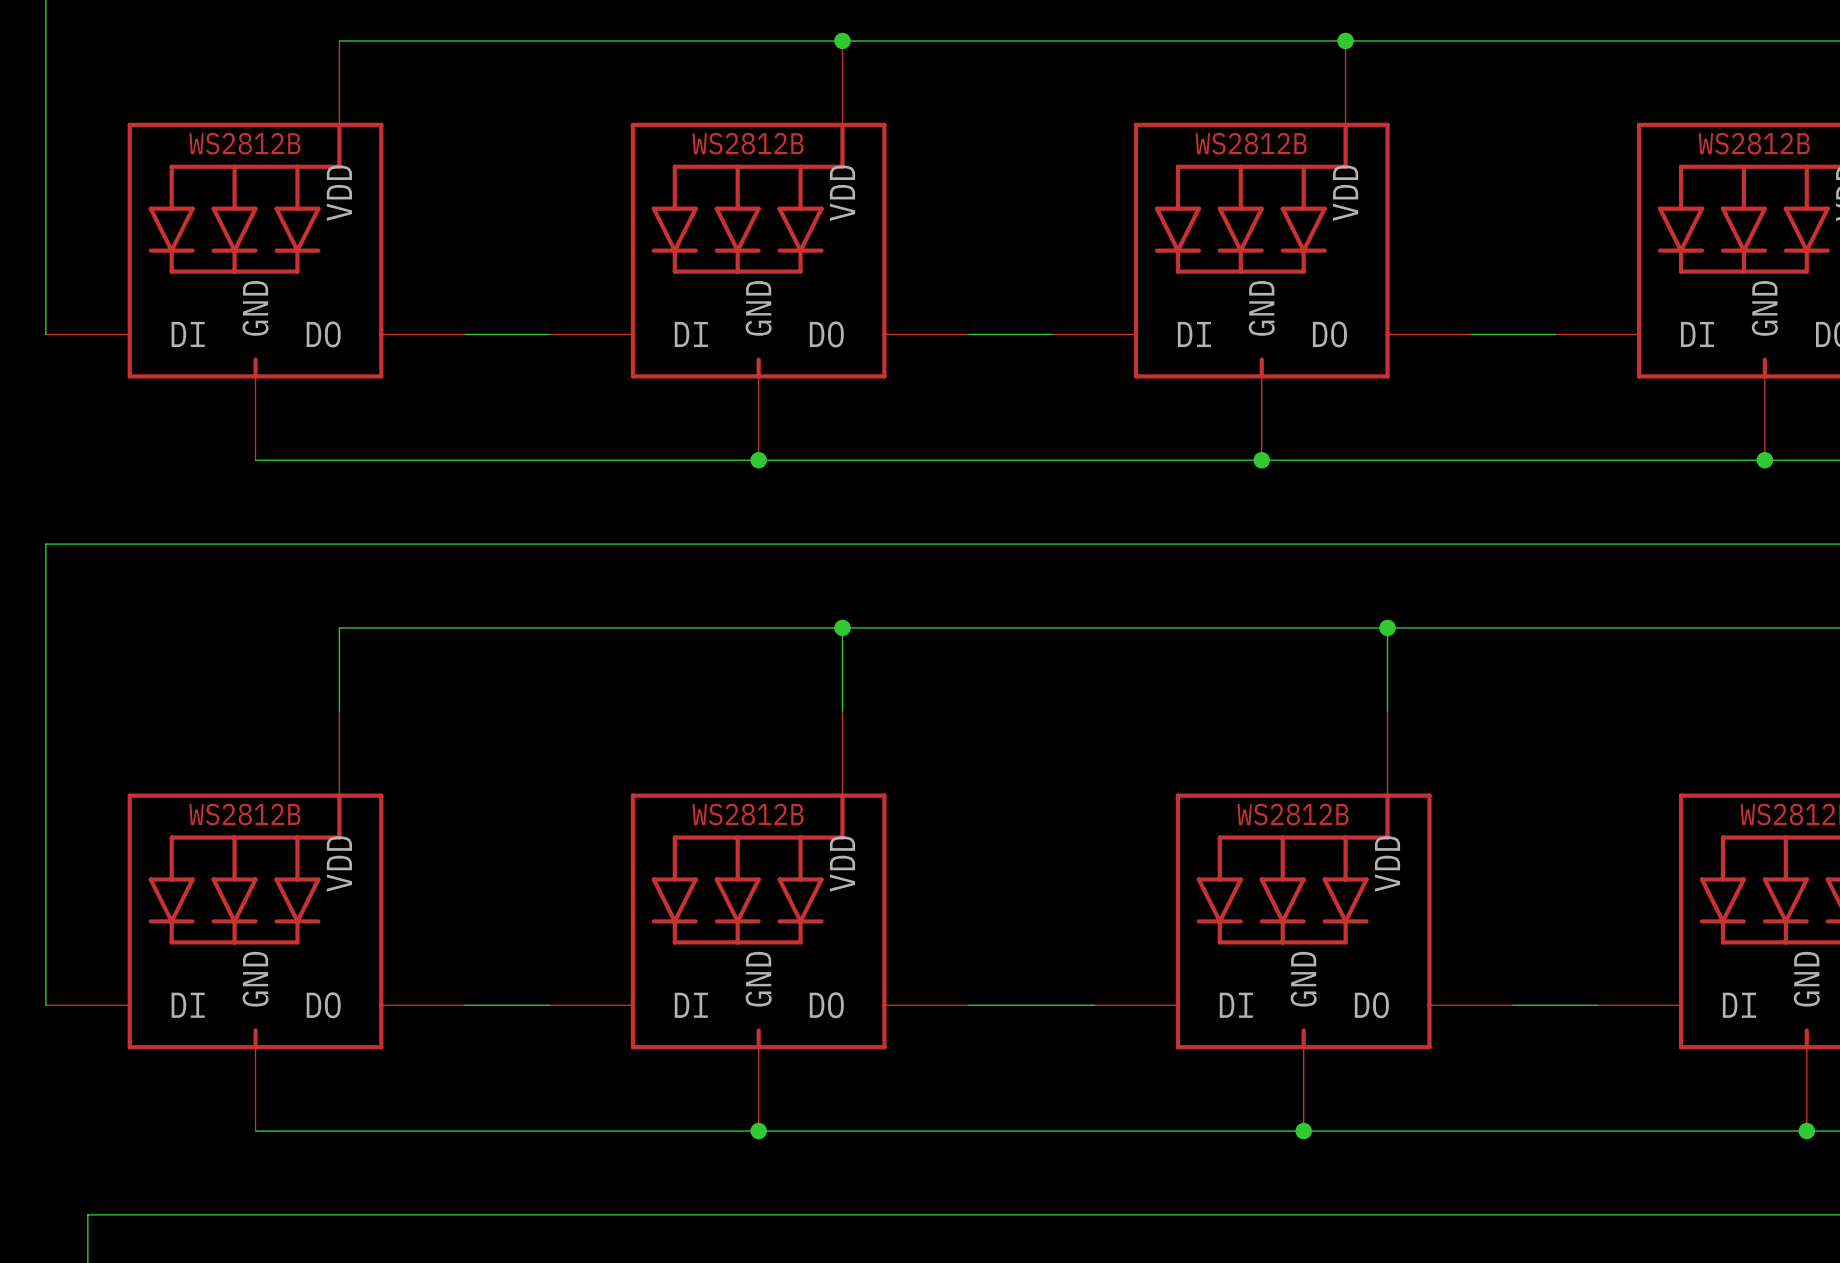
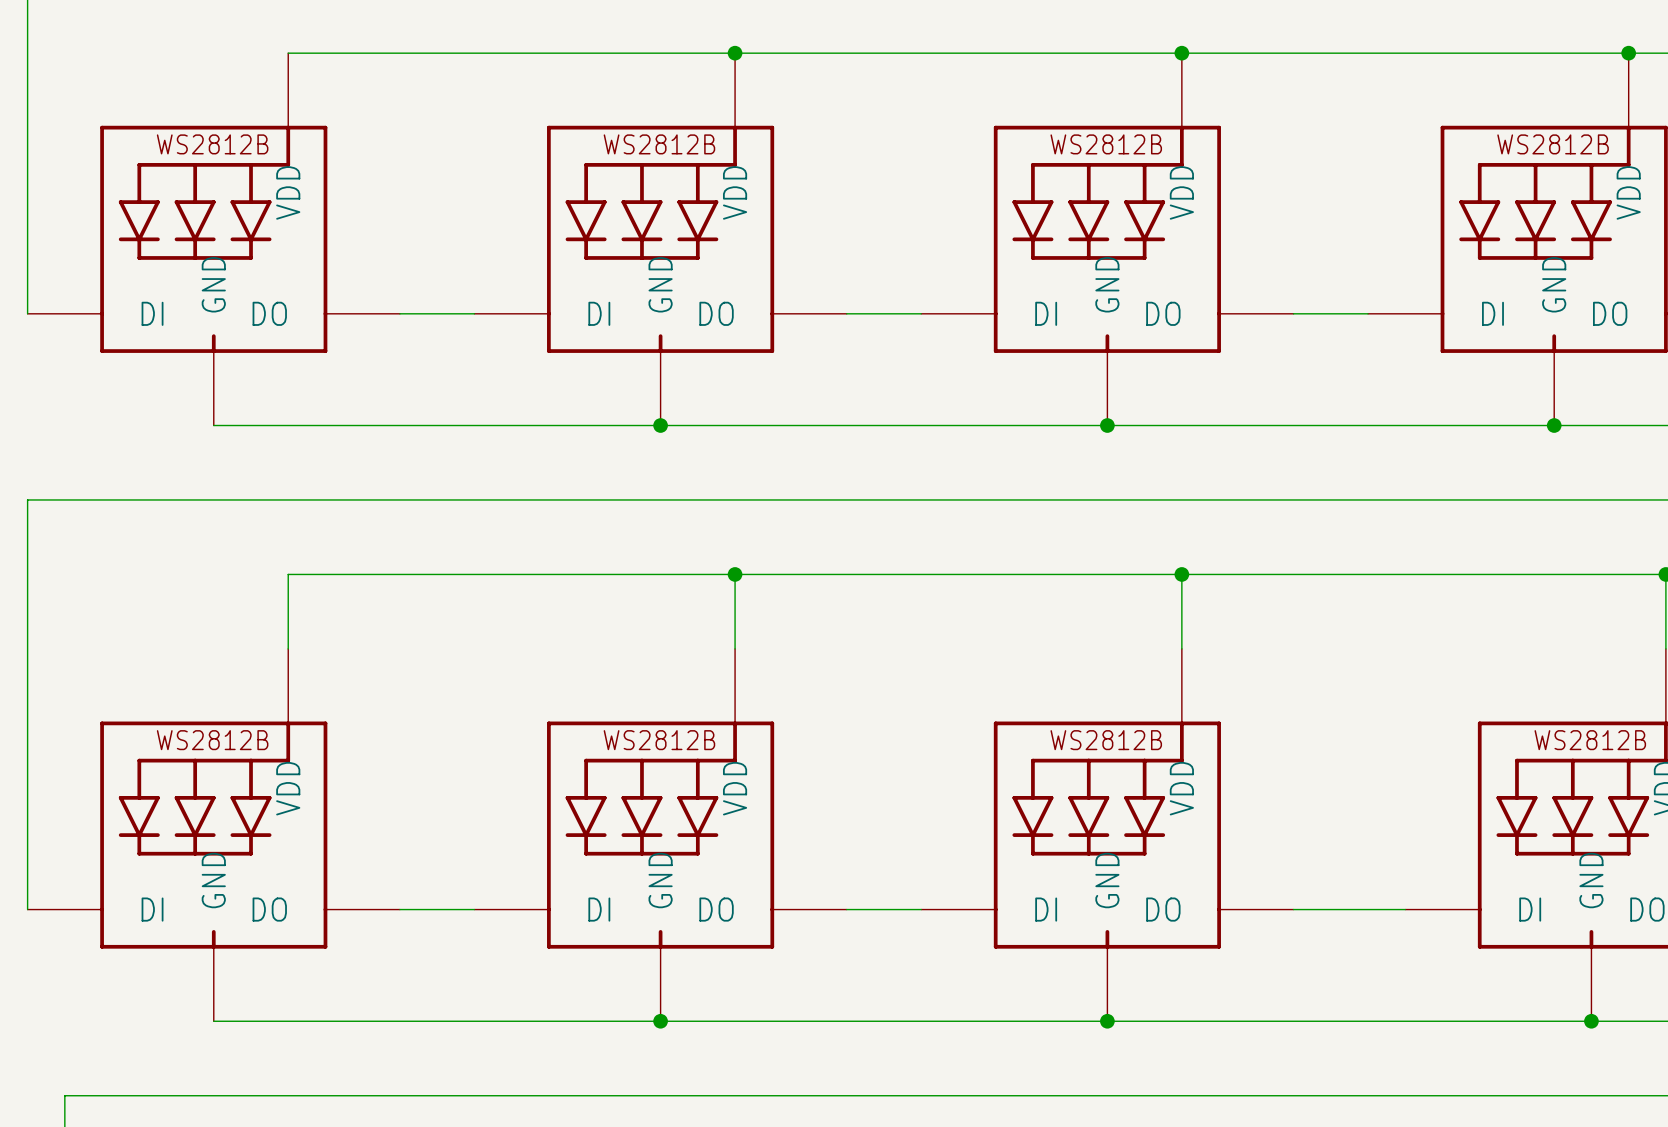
wire: (1387, 627) (1387, 711) -> (1181, 574) (1181, 648)
junction position: (1387, 627) -> (1181, 574)
part position: (1303, 921) -> (1107, 835)
junction position: (1303, 1131) -> (1107, 1021)

